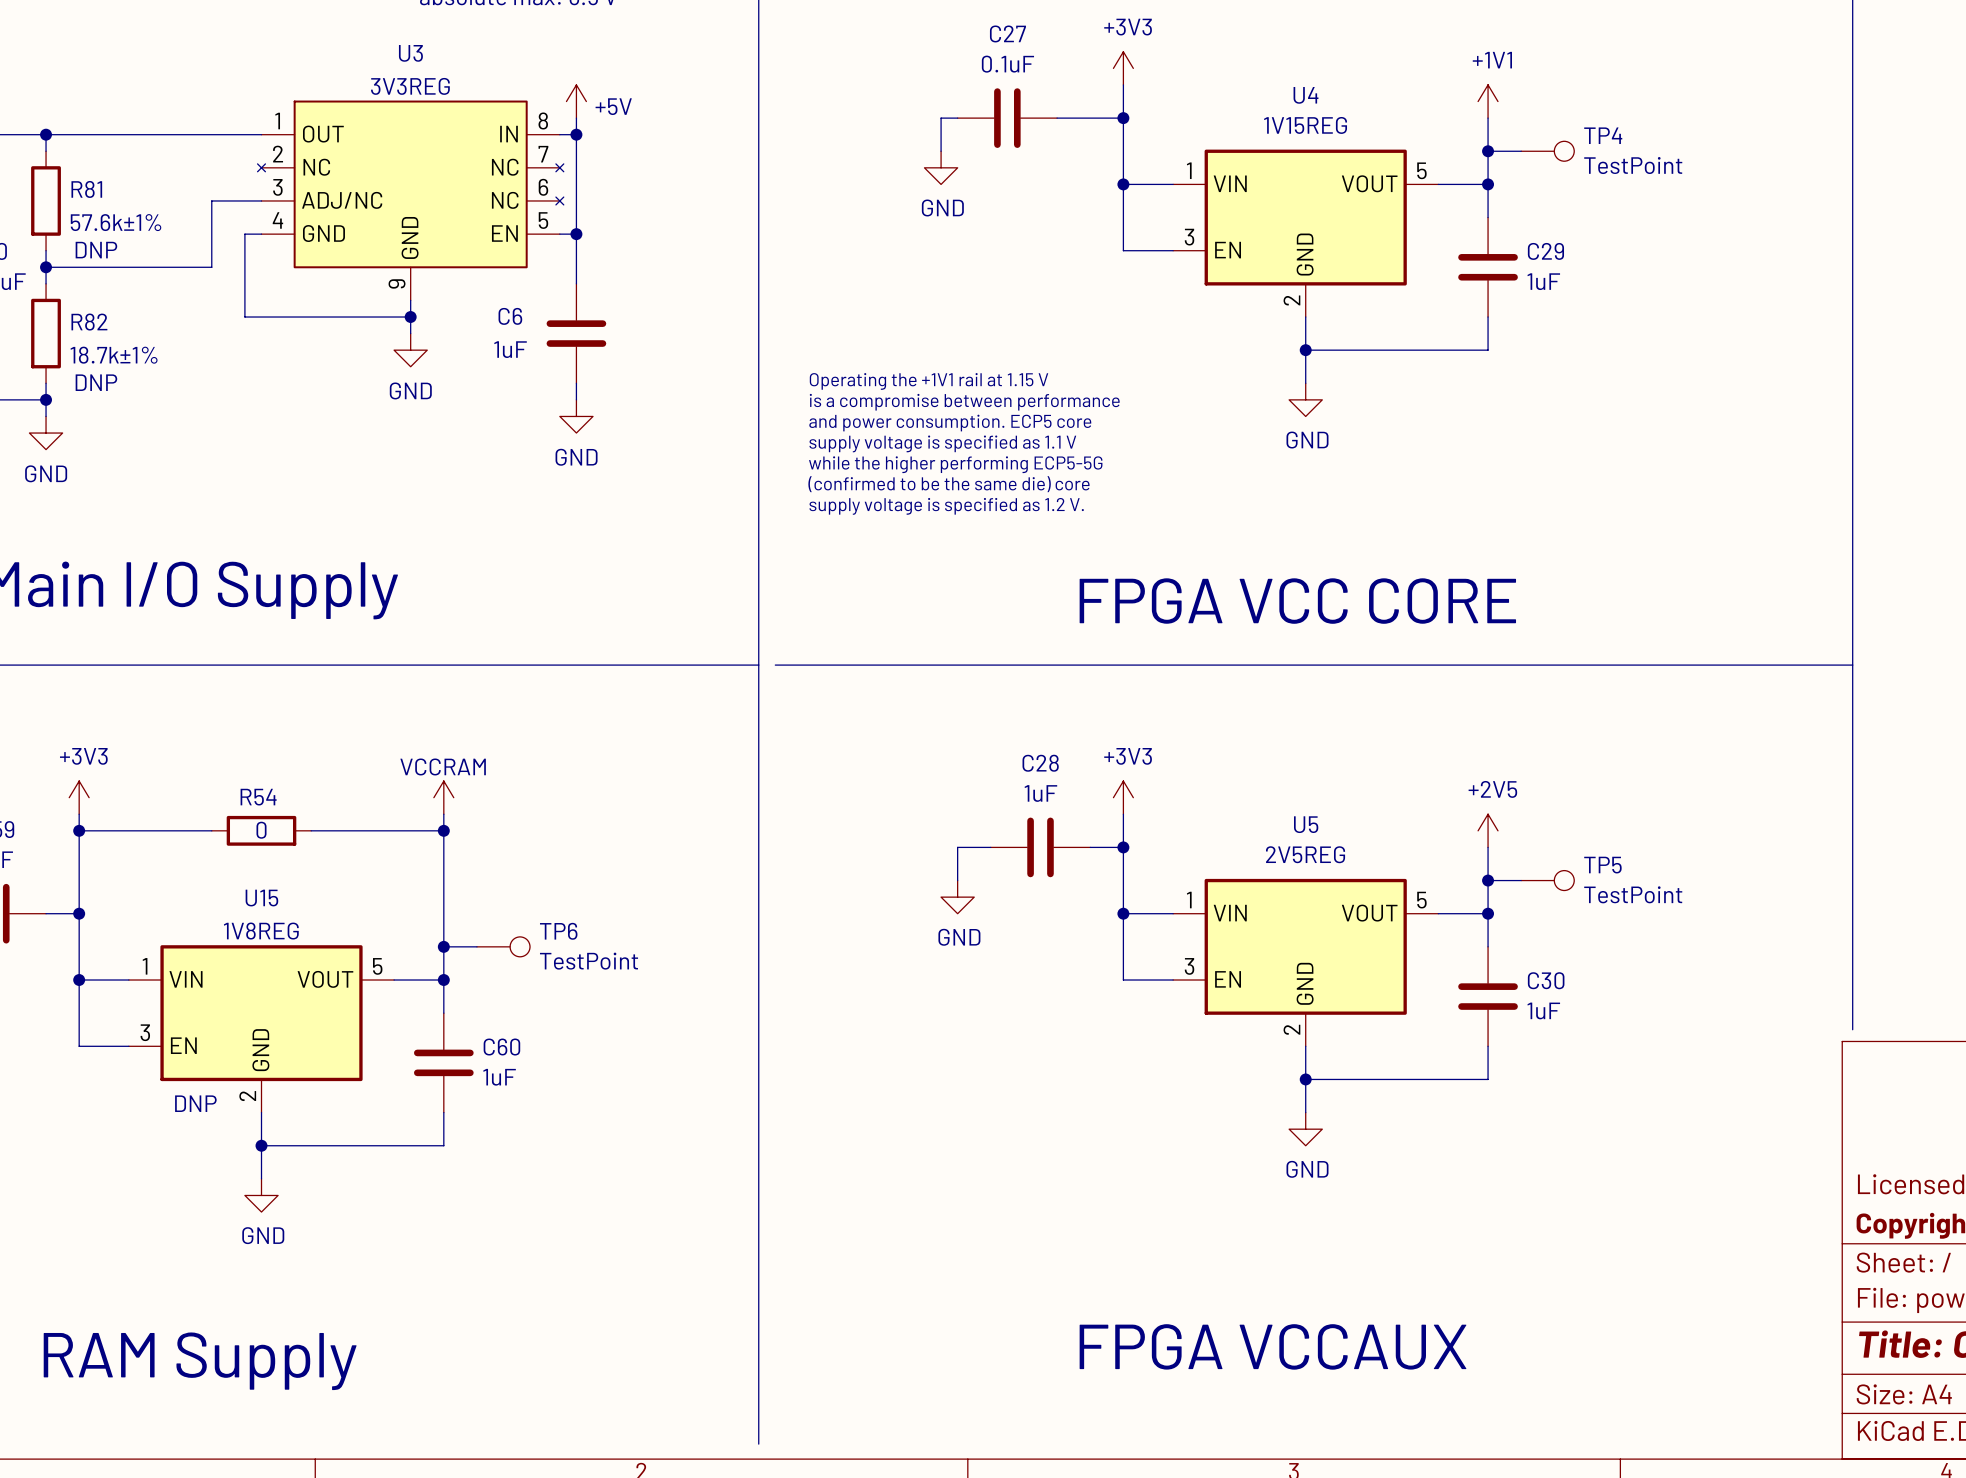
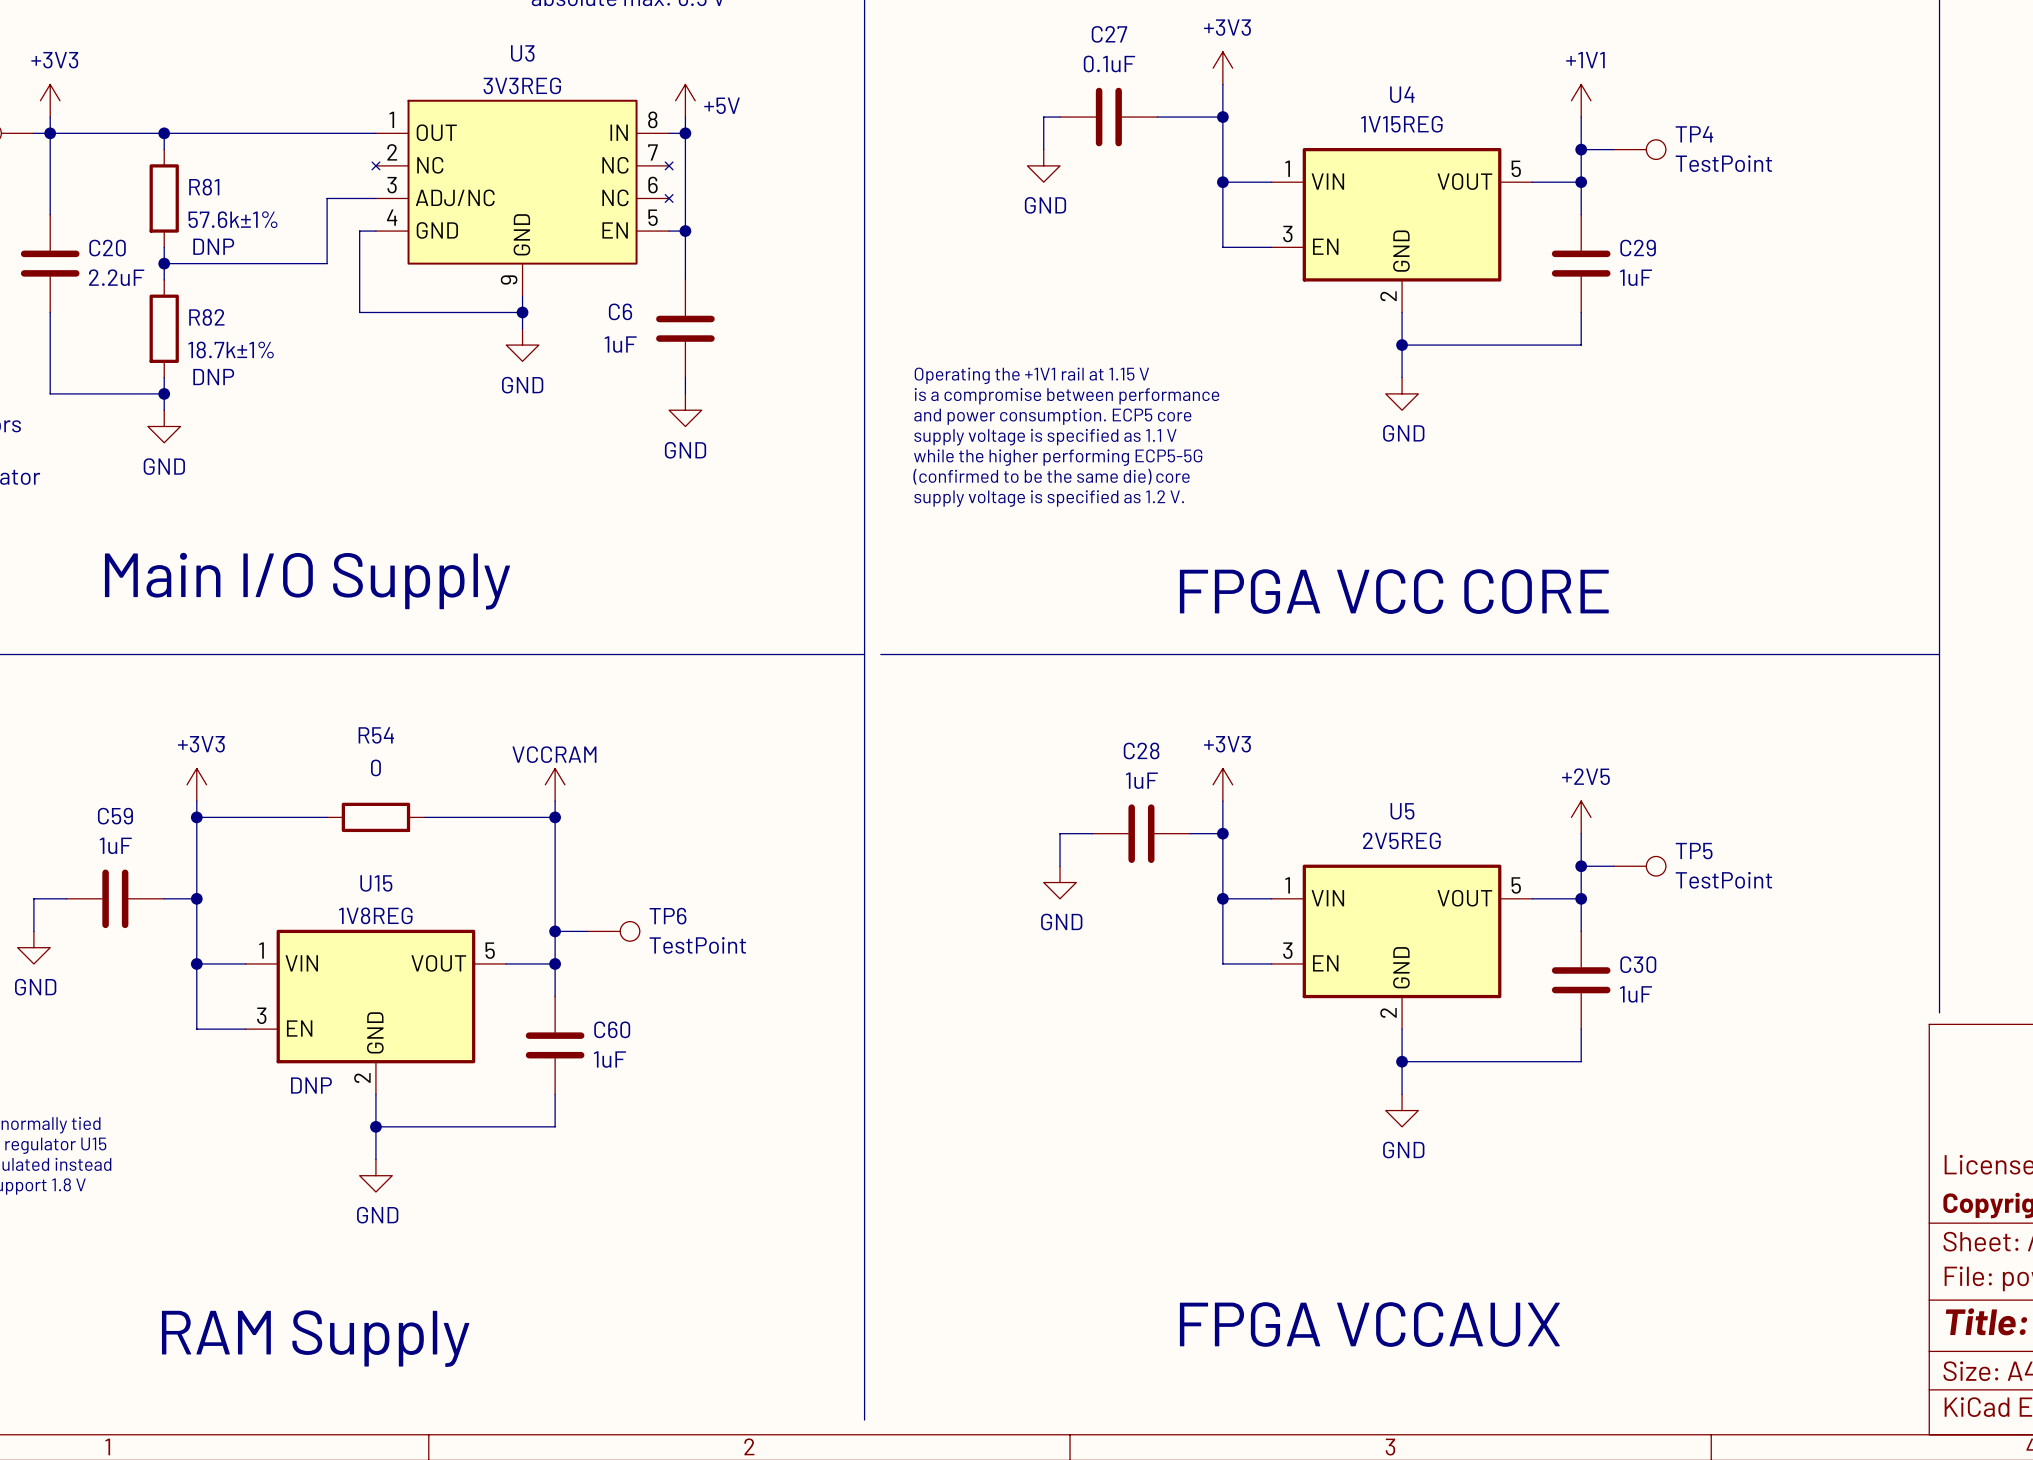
R54 name position: R54 (258, 797) -> R54 (376, 735)
R54 value position: 0 (261, 830) -> 0 (375, 767)

